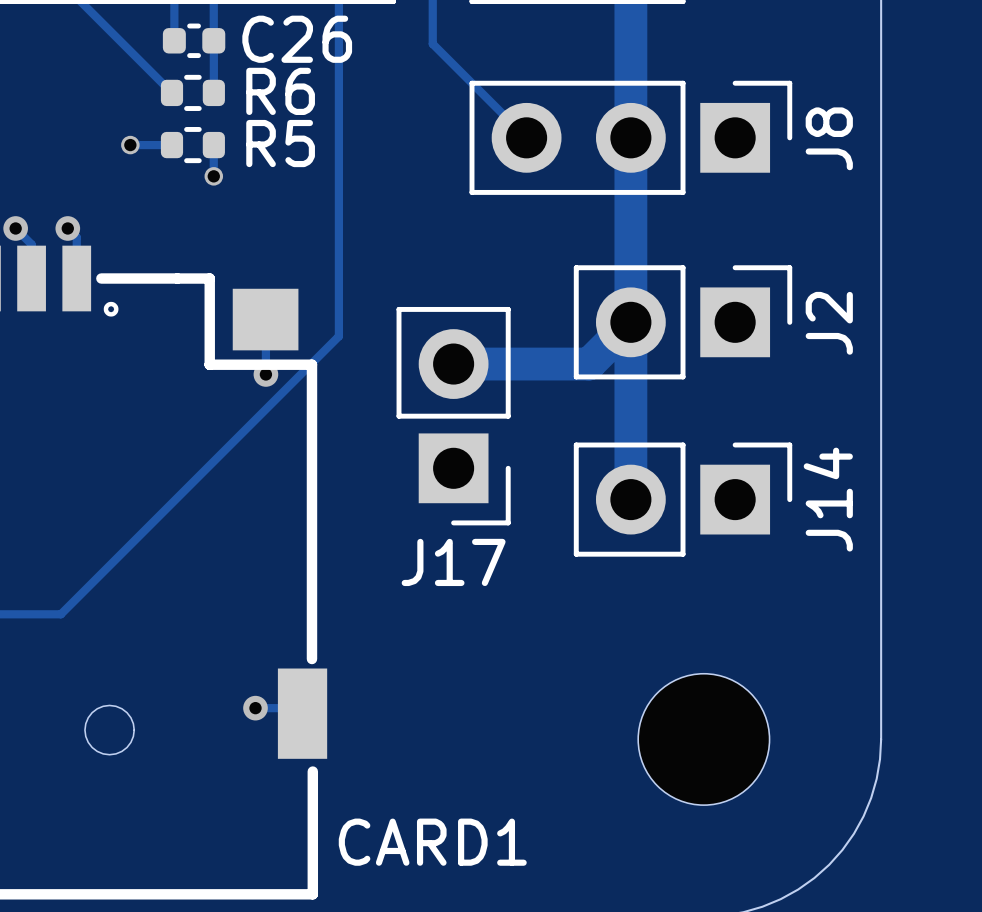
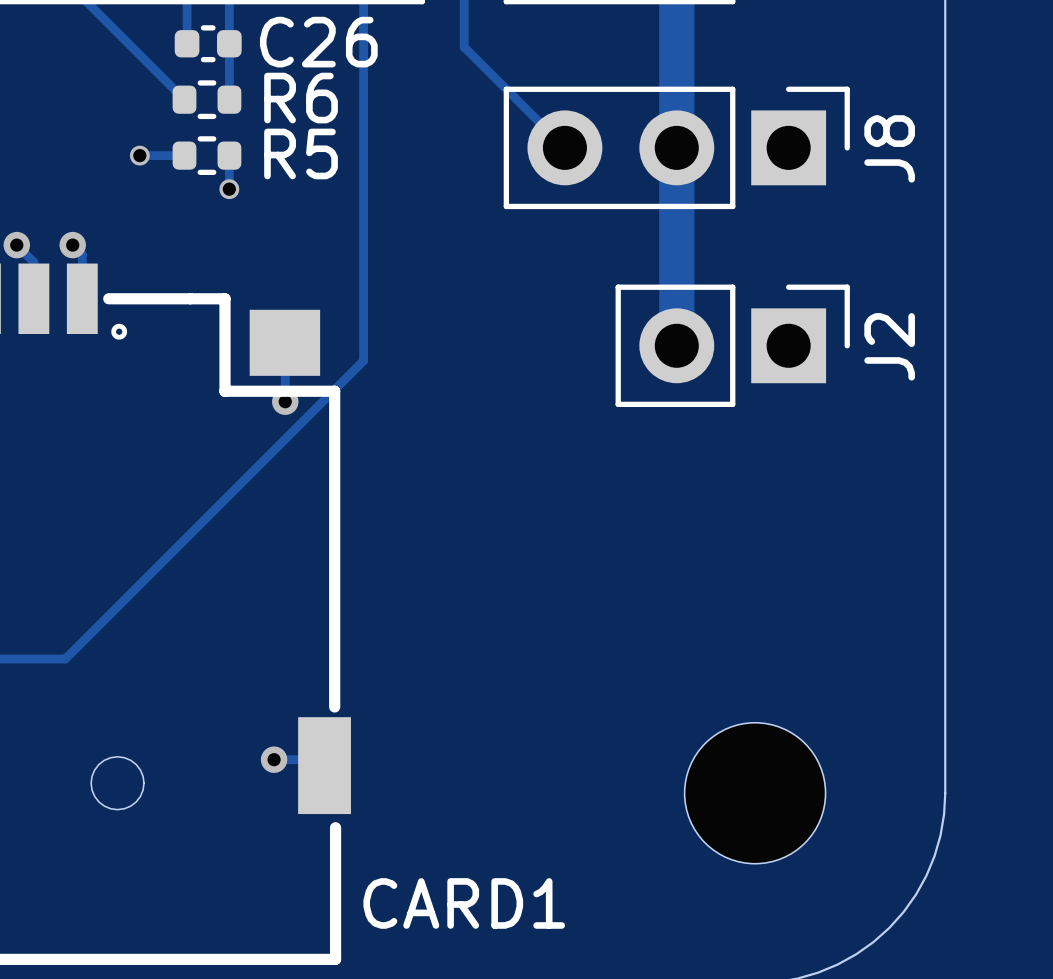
track: (453, 364) (589, 364) (630, 322) (630, 499) -> none
J17: (453, 416) -> none
J14: (683, 499) -> none

